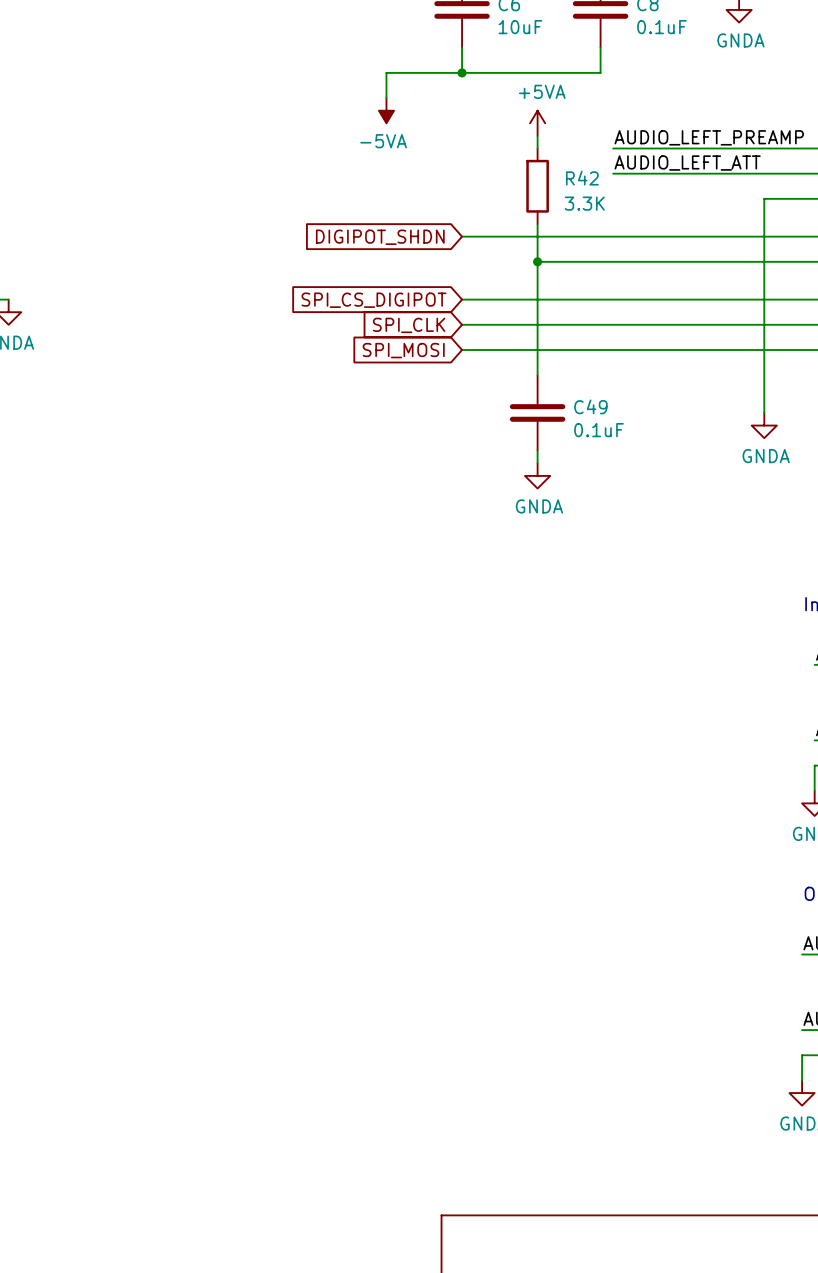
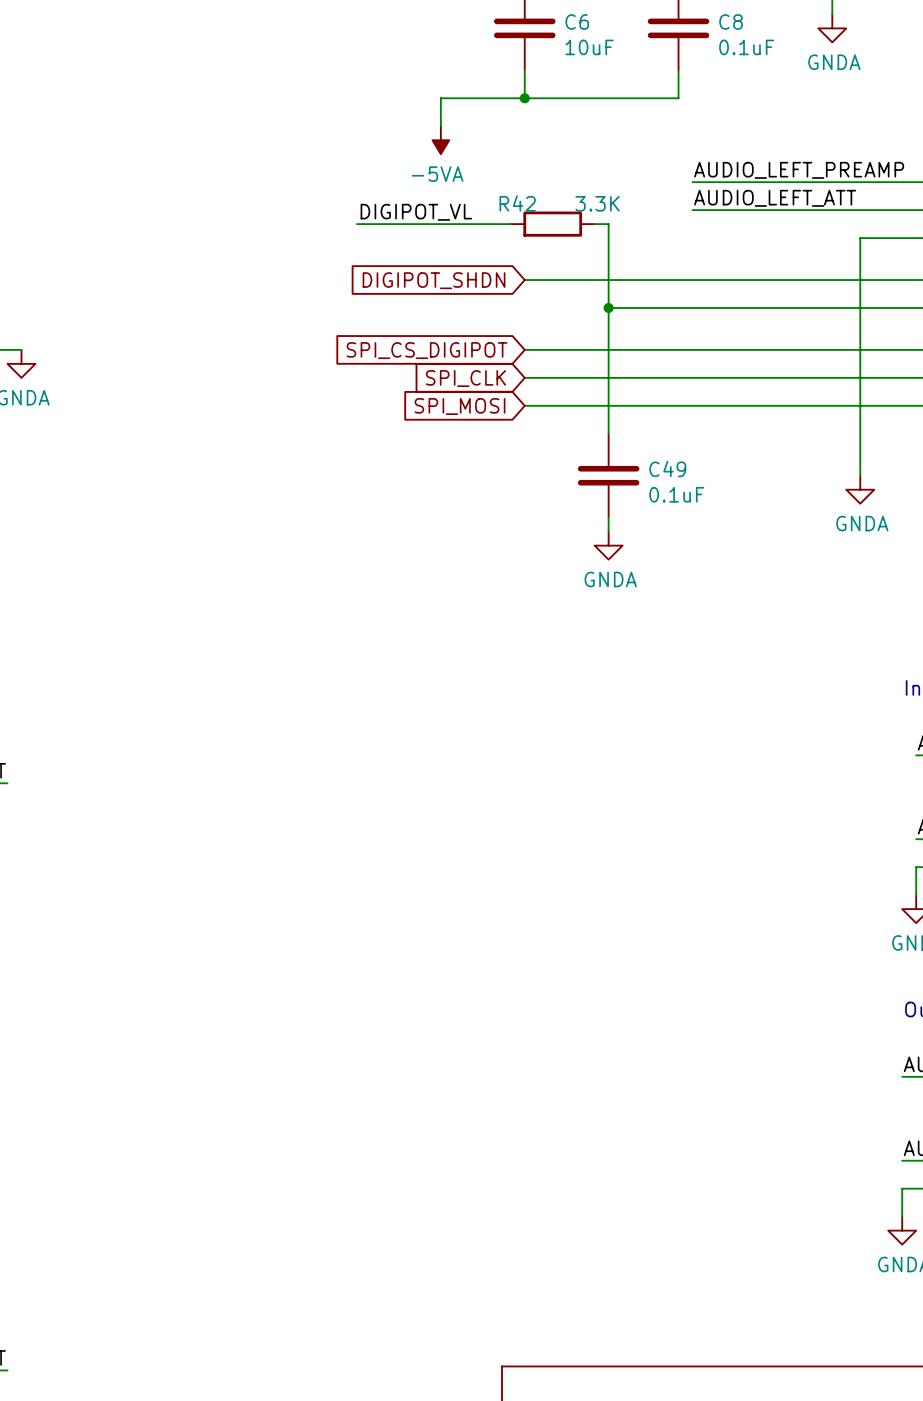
power symbol: +5VA (537, 123) -> none
wire: (537, 135) (537, 148) -> none
label: none -> DIGIPOT_VL (416, 212)
R42 name position: R42 (582, 178) -> R42 (517, 203)
wire: none -> (357, 224) (510, 224)
wire: none -> (594, 224) (608, 224) (608, 266)
R42 rotation: 0° (537, 186) -> 90° clockwise (552, 224)
R42 position: (537, 186) -> (552, 224)
R42 value position: 3.3K (584, 203) -> 3.3K (597, 203)

